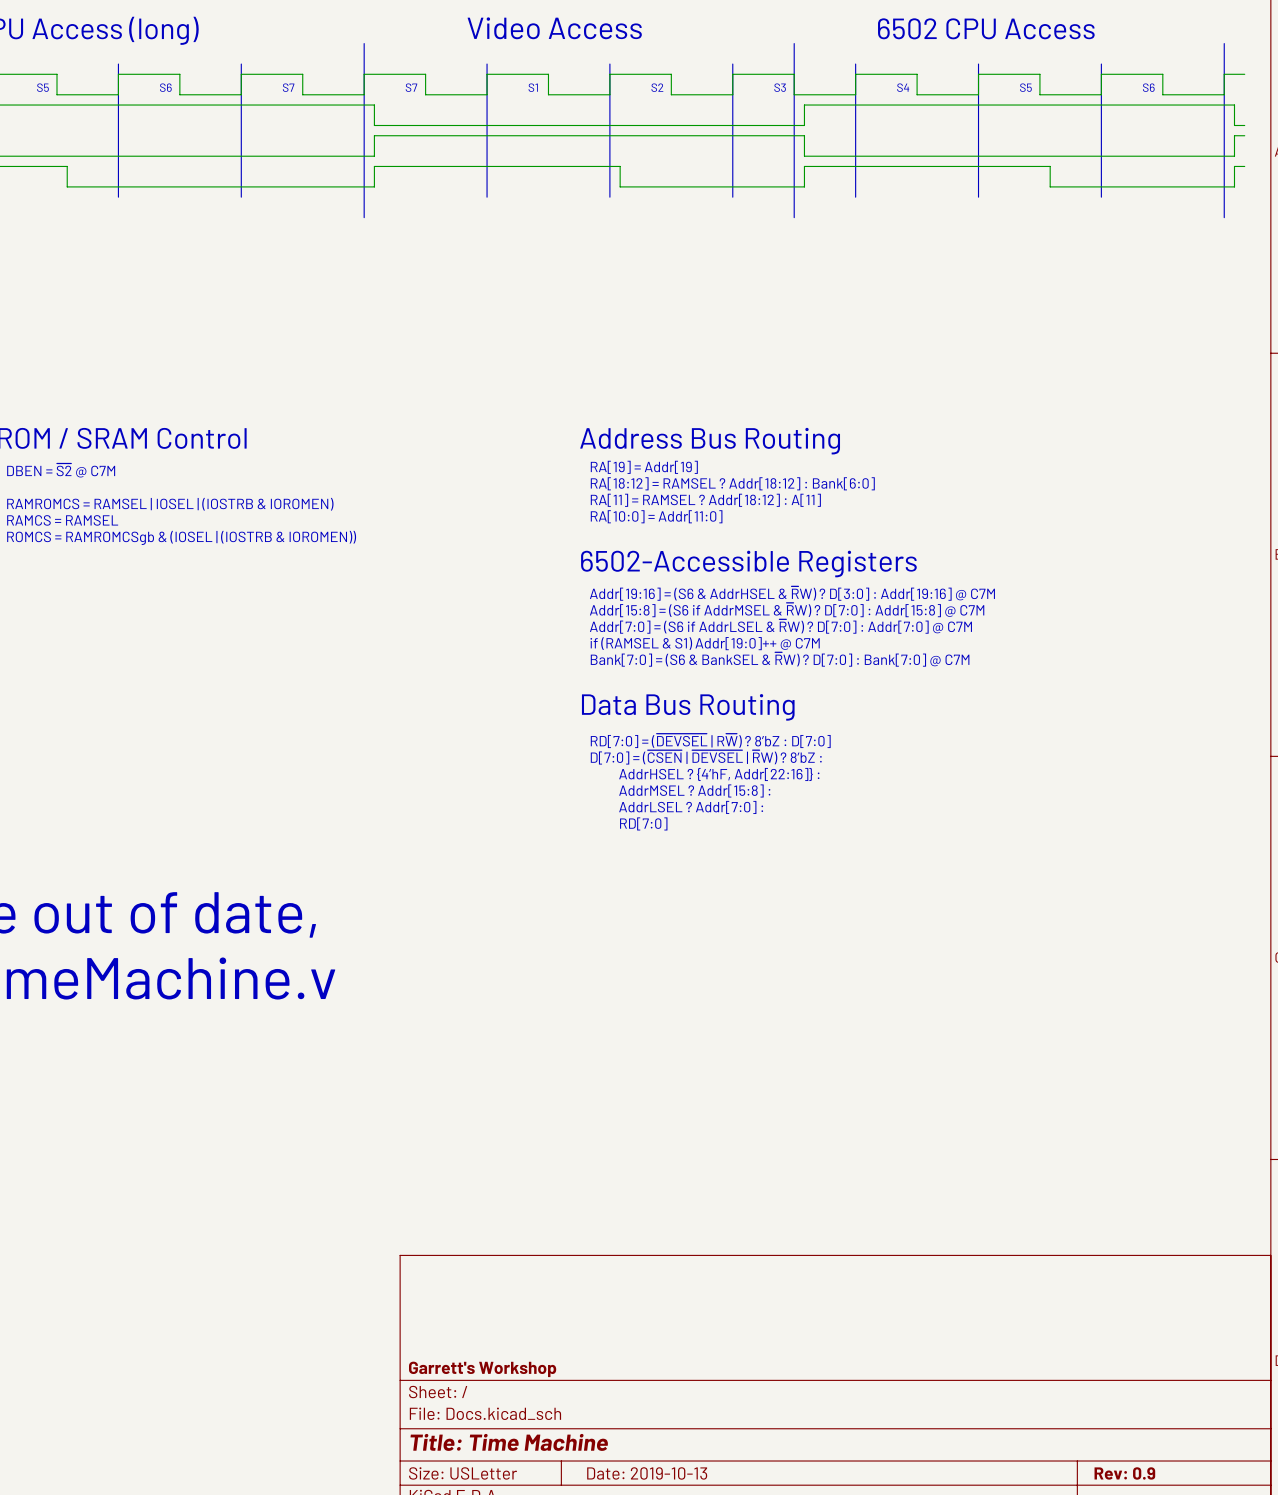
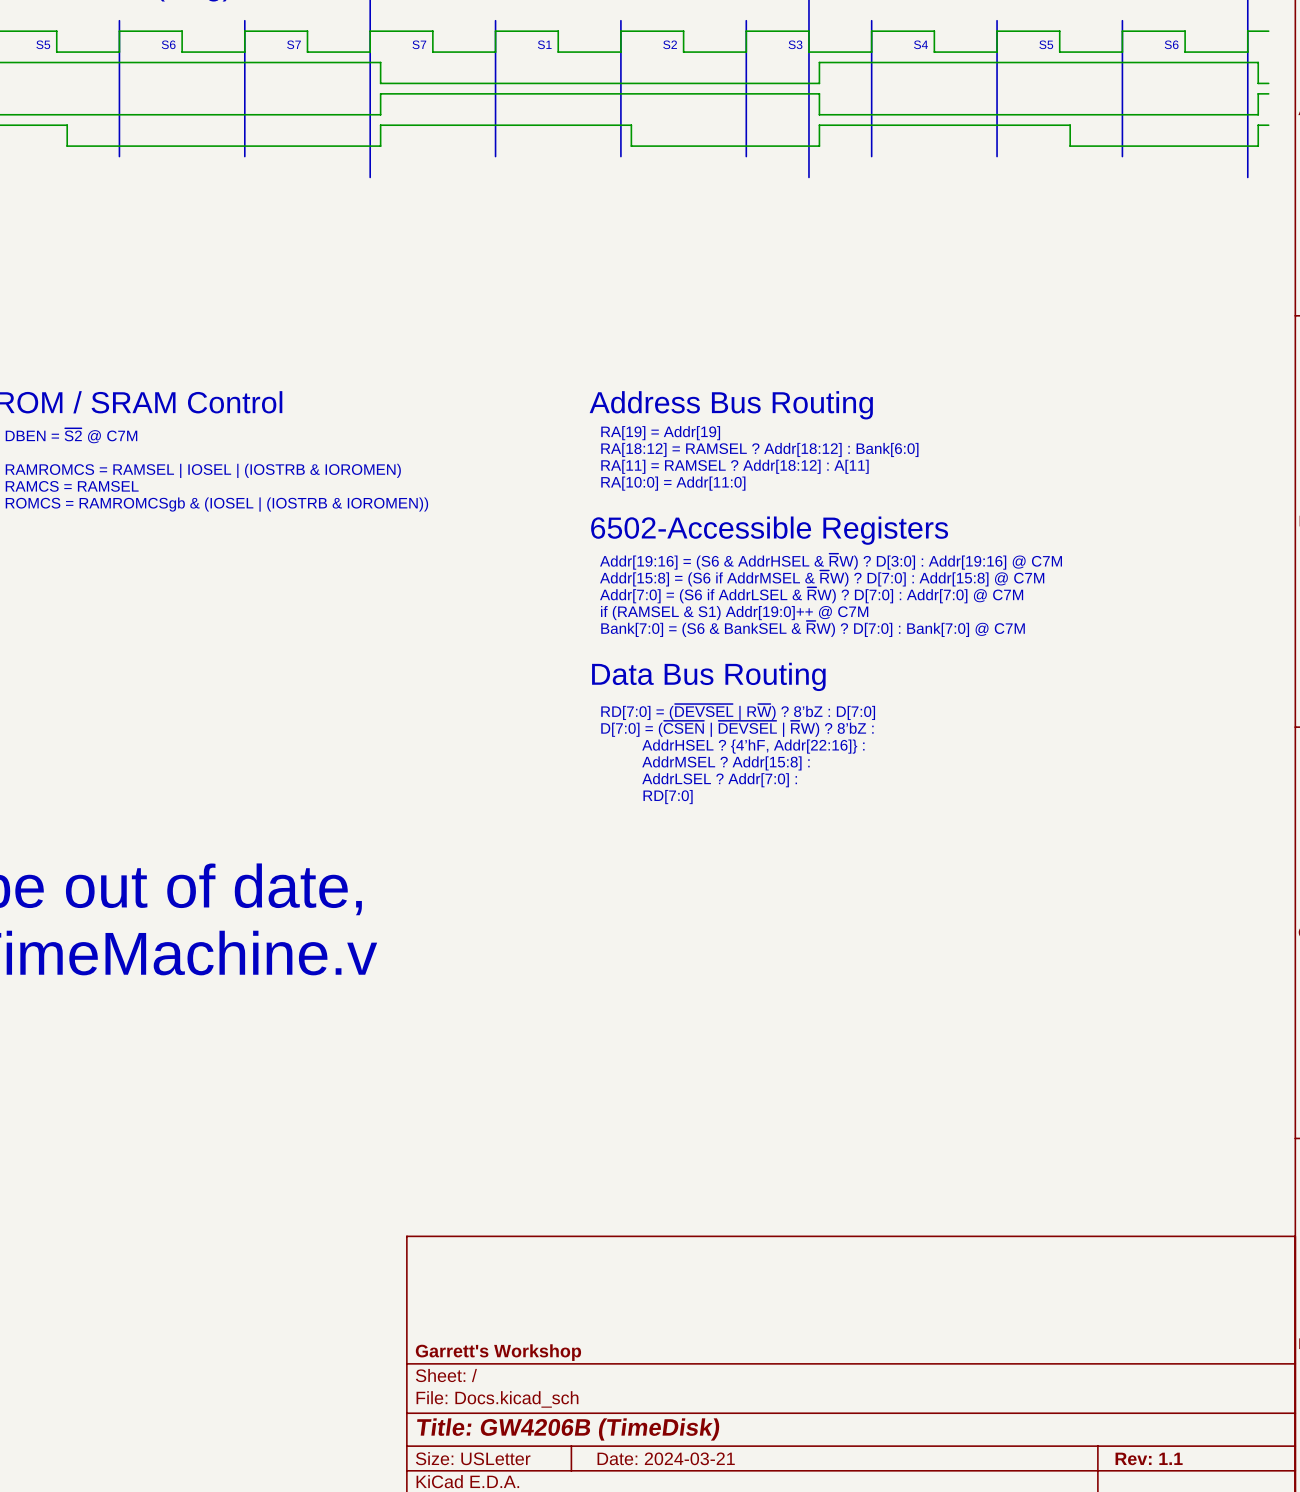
title block: Title: Time Machine (509, 1442) -> Title: GW4206B (TimeDisk) (568, 1429)
title block: Date: 2019-10-13 (647, 1473) -> Date: 2024-03-21 (666, 1458)
title block: Rev: 0.9 (1124, 1473) -> Rev: 1.1 (1149, 1458)

